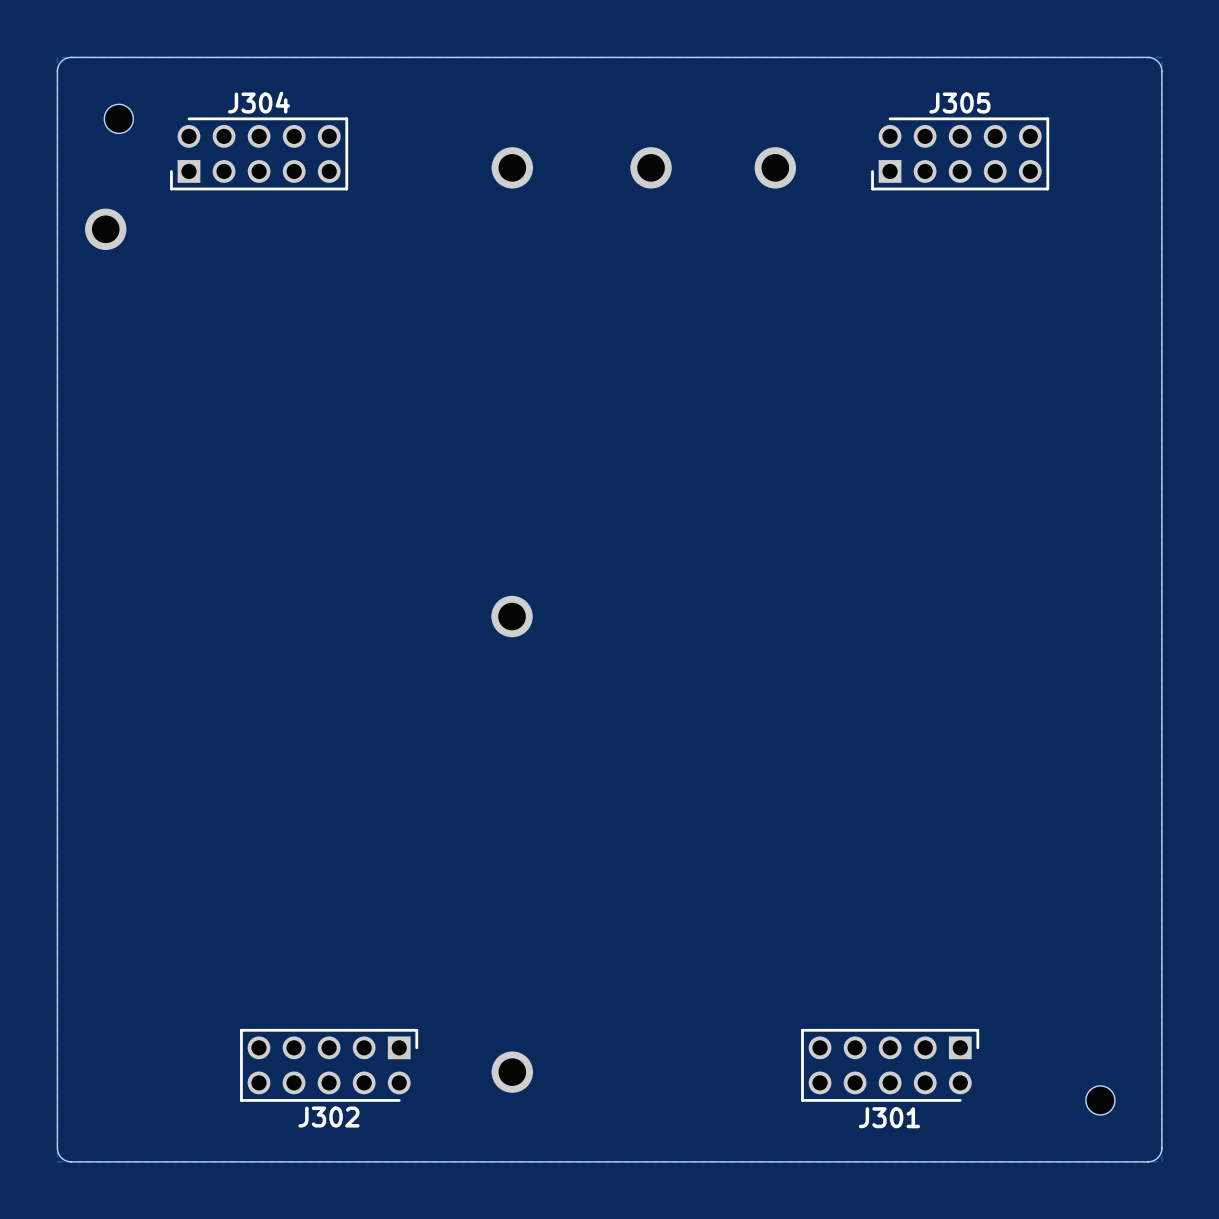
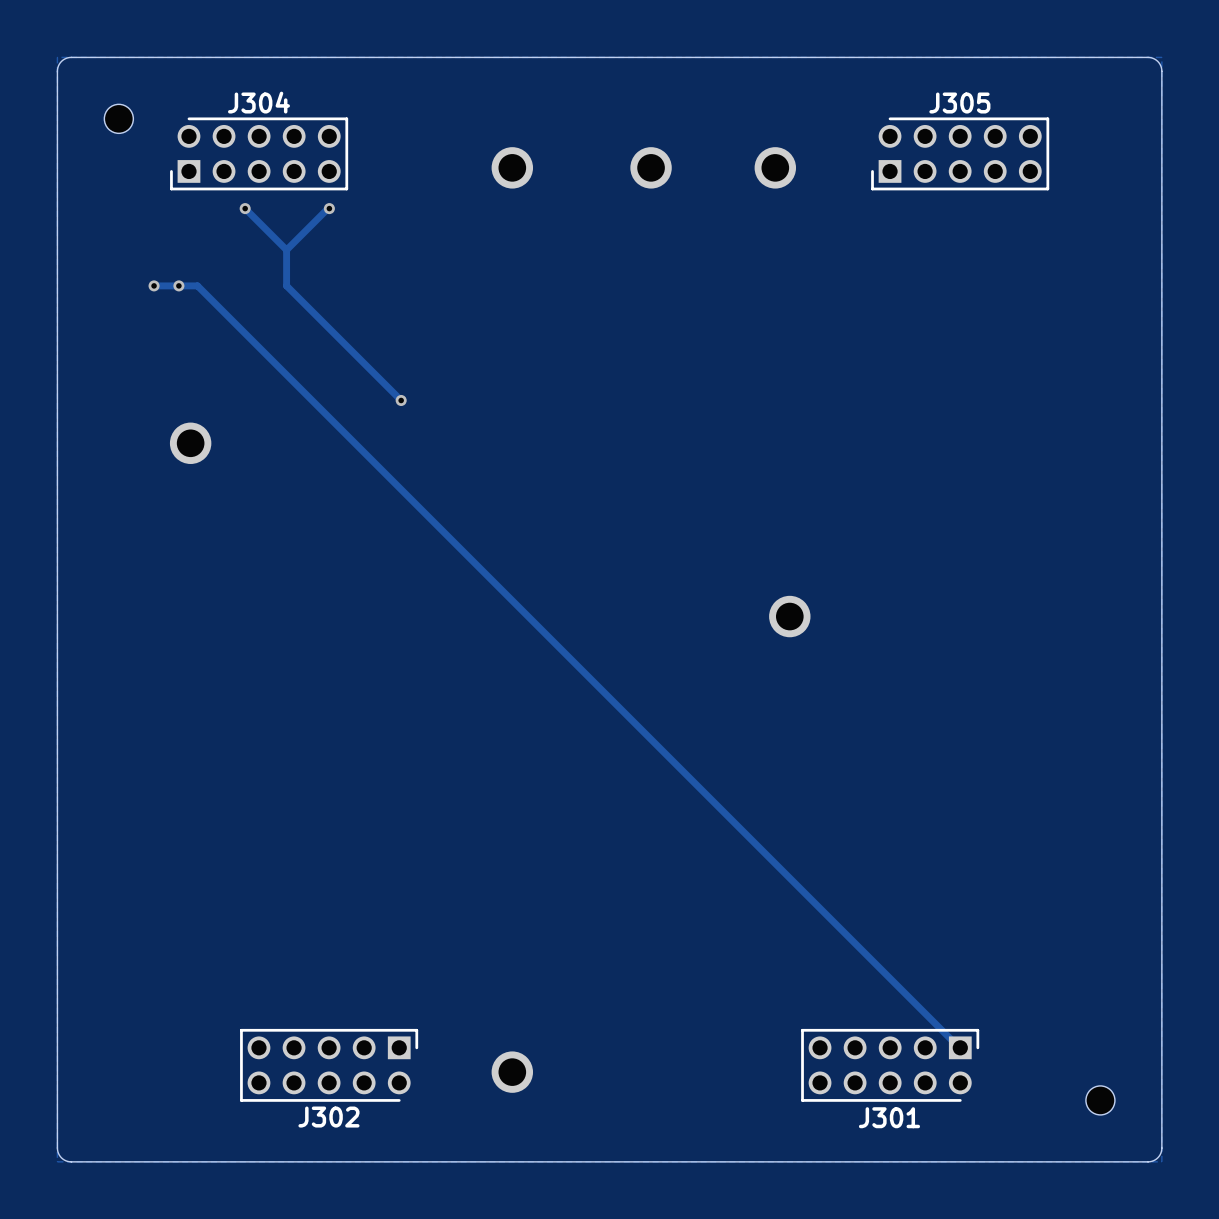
track: none -> (245, 208) (286, 250)
via: none -> (245, 208)
track: none -> (329, 208) (286, 250)
via: none -> (329, 208)
part: (105, 229) -> none
track: none -> (286, 250) (286, 285) (401, 400)
track: none -> (154, 285) (197, 285) (960, 1047)
via: none -> (154, 285)
via: none -> (178, 285)
via: none -> (401, 400)
part: none -> (190, 443)
part: (512, 616) -> none
part: none -> (789, 616)

